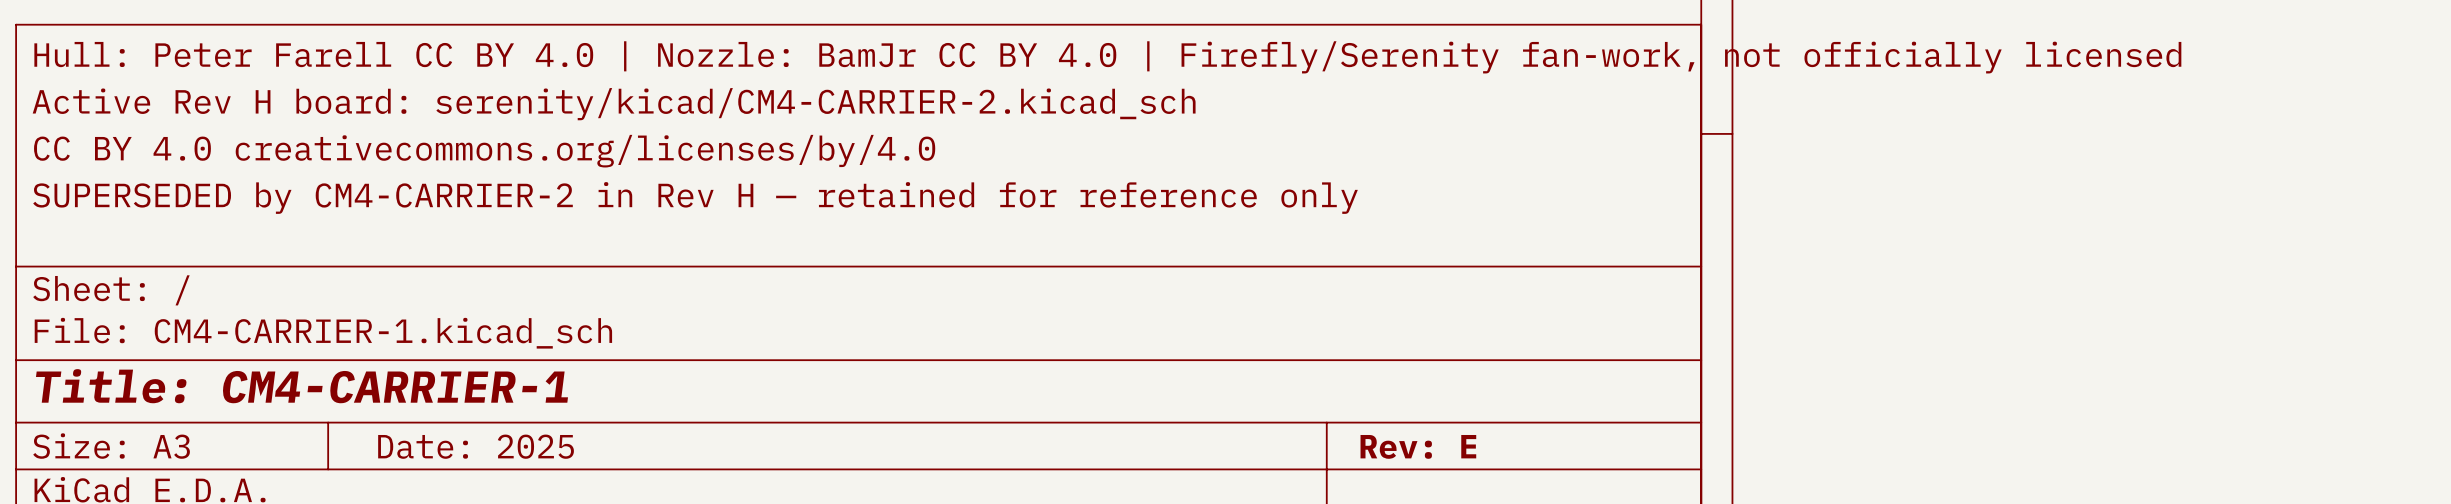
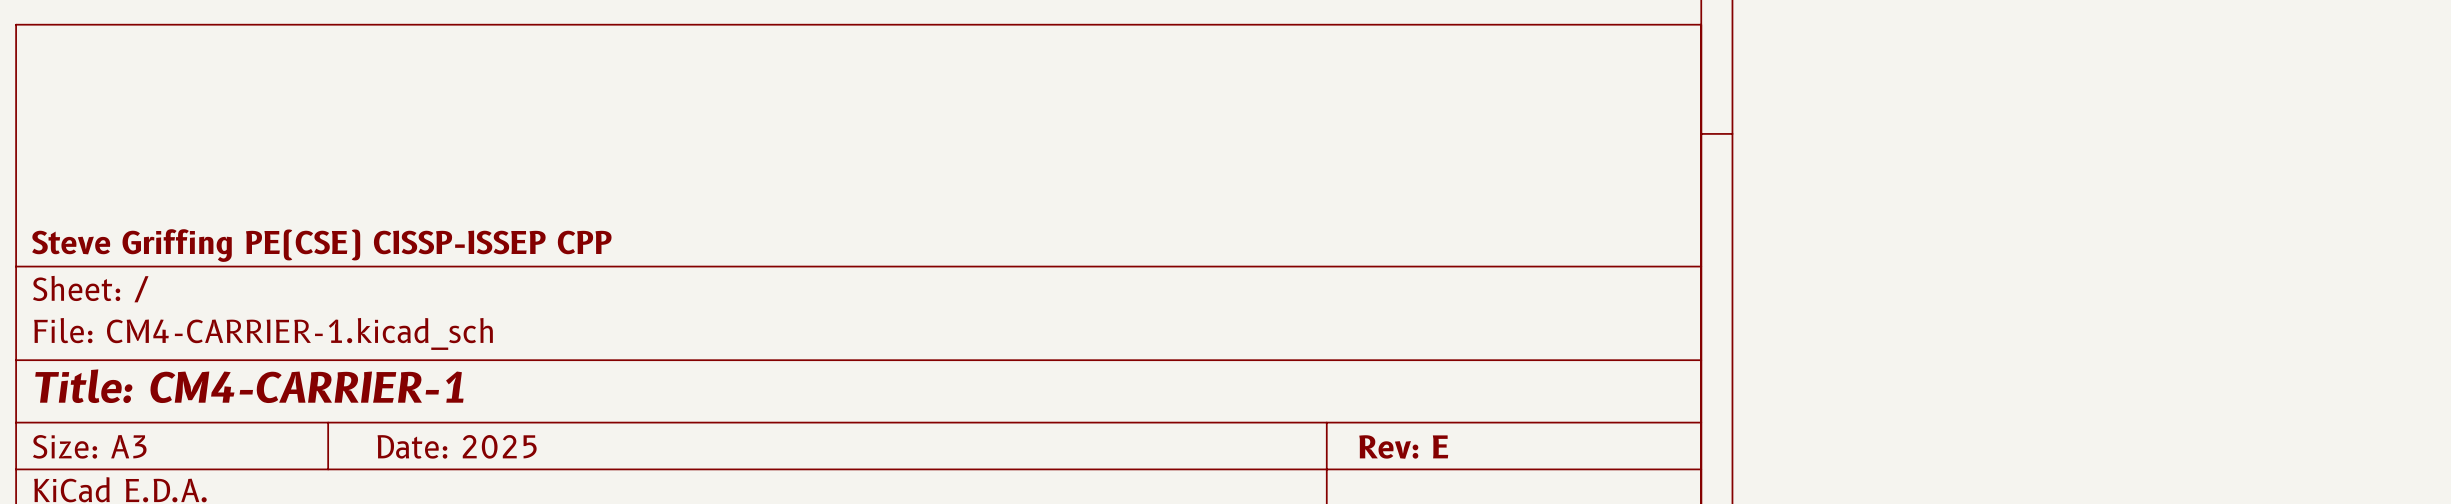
title block: Hull: Peter Farell CC BY 4.0 | Nozzle: BamJr CC BY 4.0 | Firefly/Serenity fan-work, not officially licensed (1107, 57) -> none
title block: Active Rev H board: serenity/kicad/CM4-CARRIER-2.kicad_sch (614, 104) -> none
title block: CC BY 4.0 creativecommons.org/licenses/by/4.0 (484, 151) -> none
title block: SUPERSEDED by CM4-CARRIER-2 in Rev H — retained for reference only (695, 197) -> none
title block: none -> Steve Griffing PE(CSE) CISSP-ISSEP CPP (321, 245)

